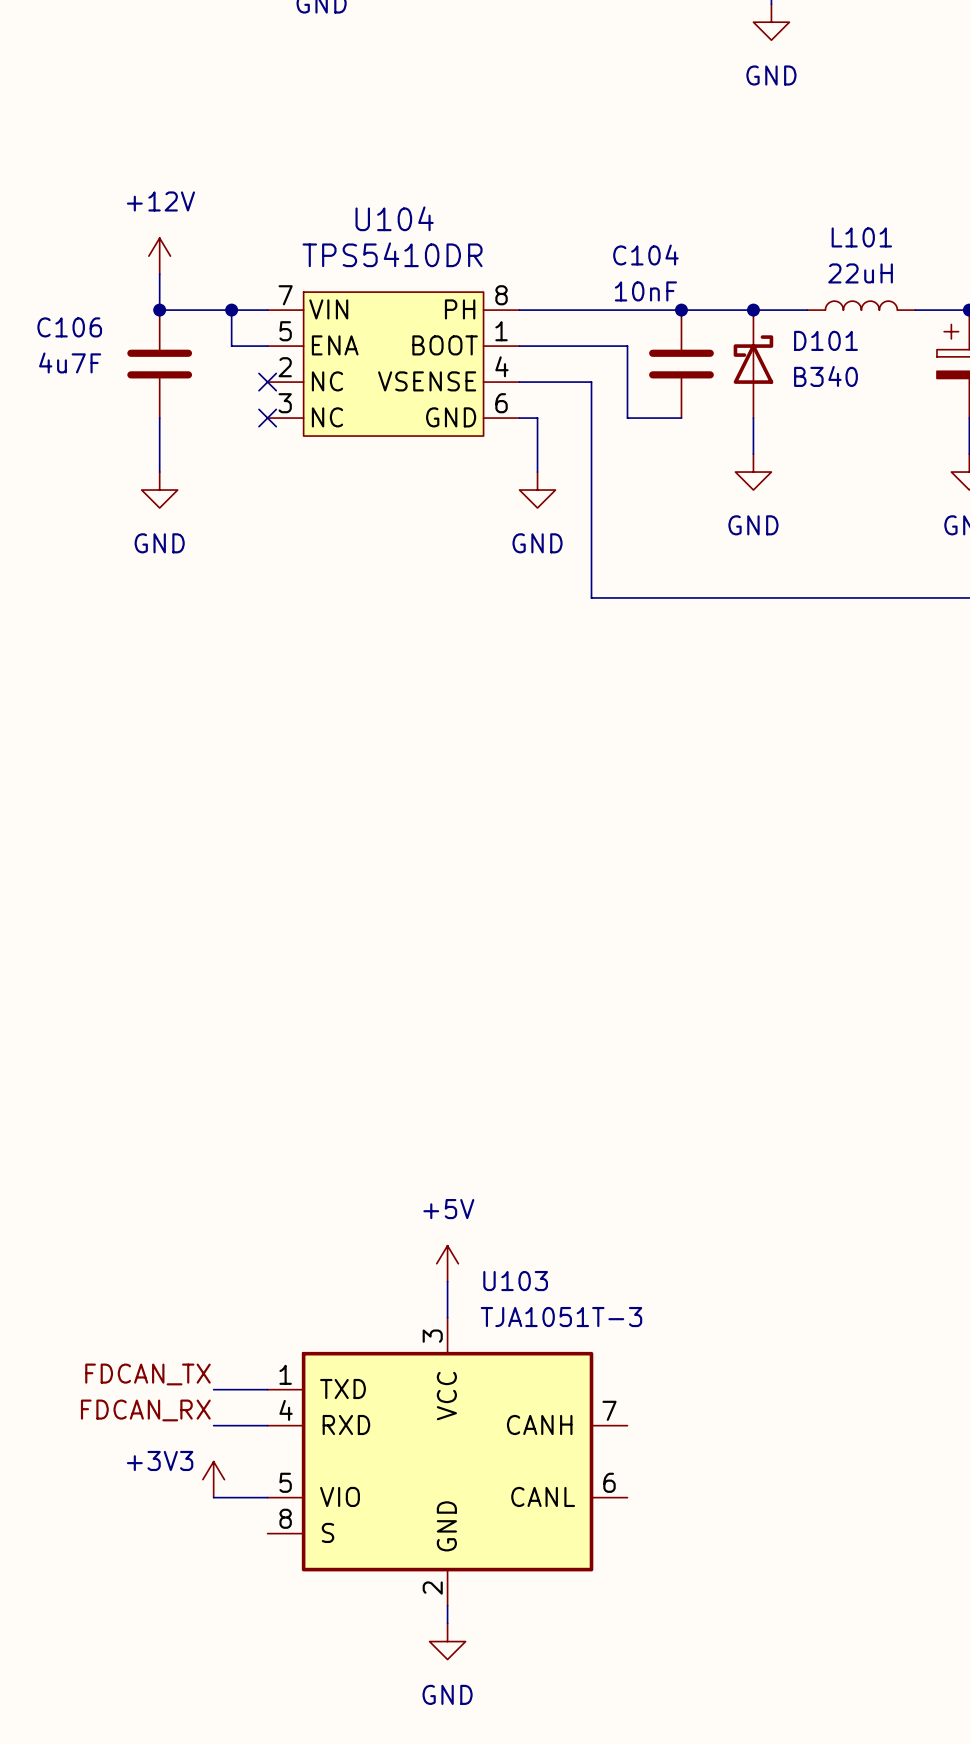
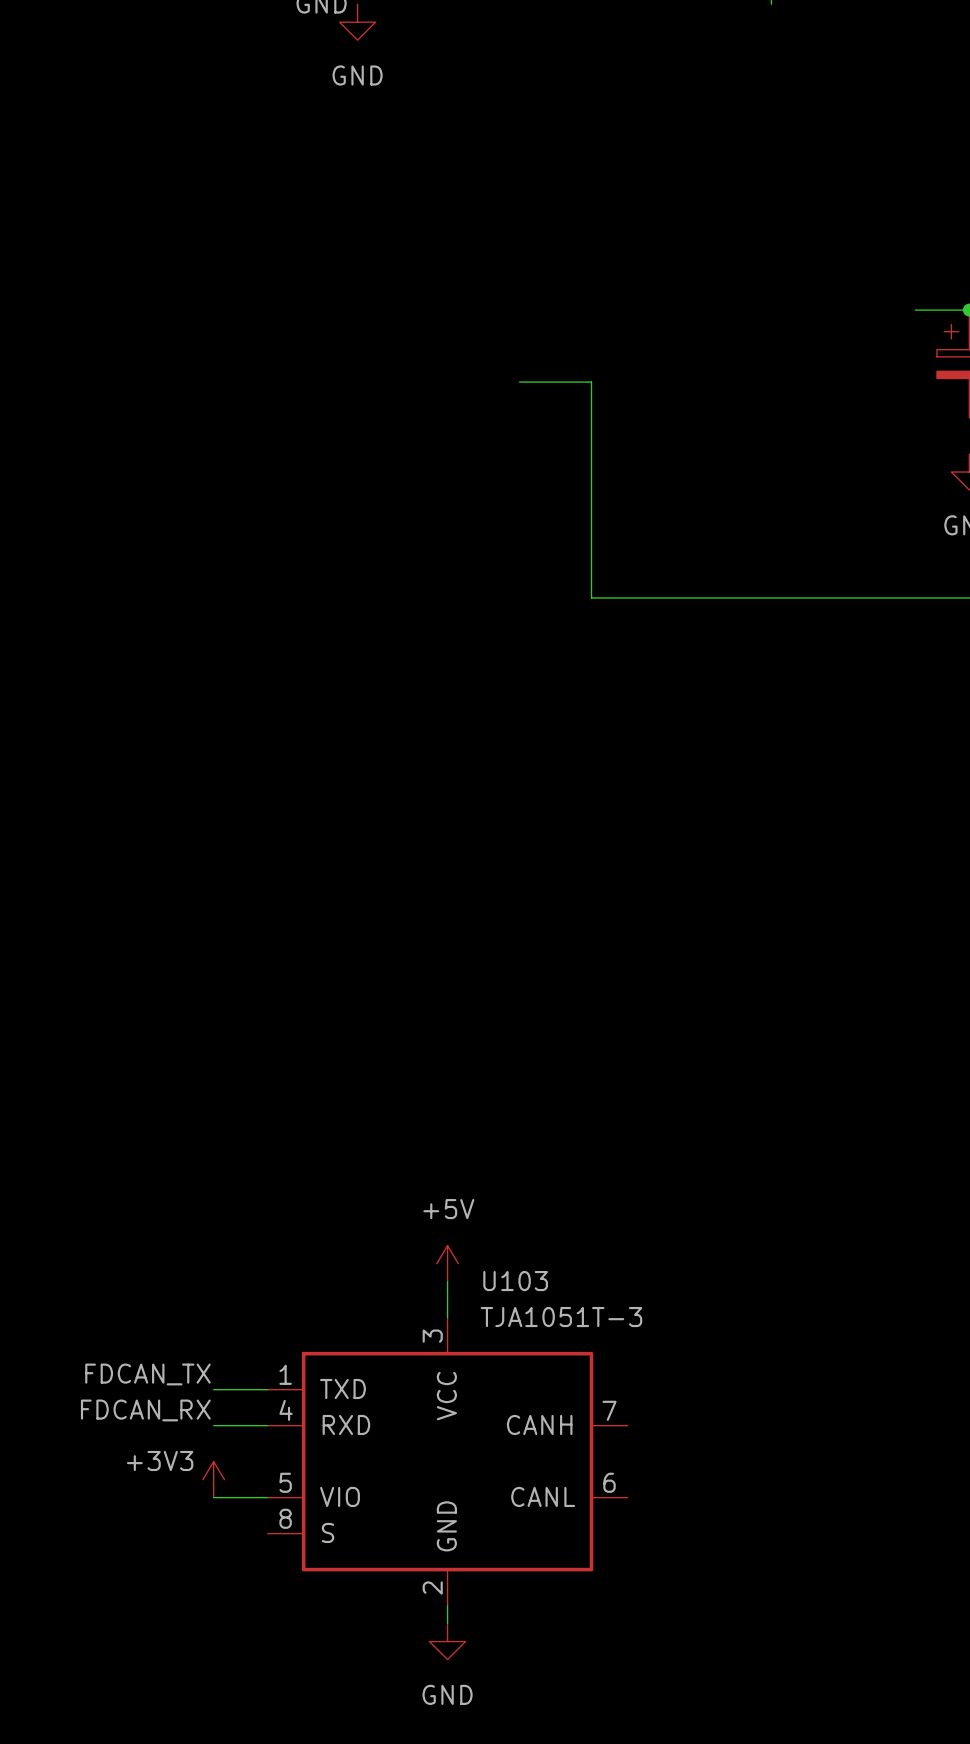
power symbol: none -> GND (357, 22)
power symbol: GND (771, 22) -> none
power symbol: +12V (159, 256) -> none
wire: (159, 274) (159, 310) (267, 310) -> none
L101: 22uH (861, 305) -> none
junction: (159, 310) -> none
wire: (231, 310) (231, 346) (267, 346) -> none
junction: (231, 310) -> none
wire: (519, 310) (807, 310) -> none
junction: (681, 310) -> none
junction: (753, 310) -> none
wire: (519, 346) (627, 346) (627, 418) (681, 418) -> none
C106: 4u7F (159, 364) -> none
U104: TPS5410DR (393, 364) -> none
C104: 10nF (681, 364) -> none
D101: B340 (753, 364) -> none
no-connect mark: (267, 382) -> none
wire: (159, 418) (159, 472) -> none
no-connect mark: (267, 418) -> none
wire: (519, 418) (537, 418) (537, 472) -> none
wire: (753, 418) (753, 454) -> none
wire: (969, 418) (969, 454) -> none
power symbol: GND (753, 472) -> none
power symbol: GND (159, 490) -> none
power symbol: GND (537, 490) -> none

